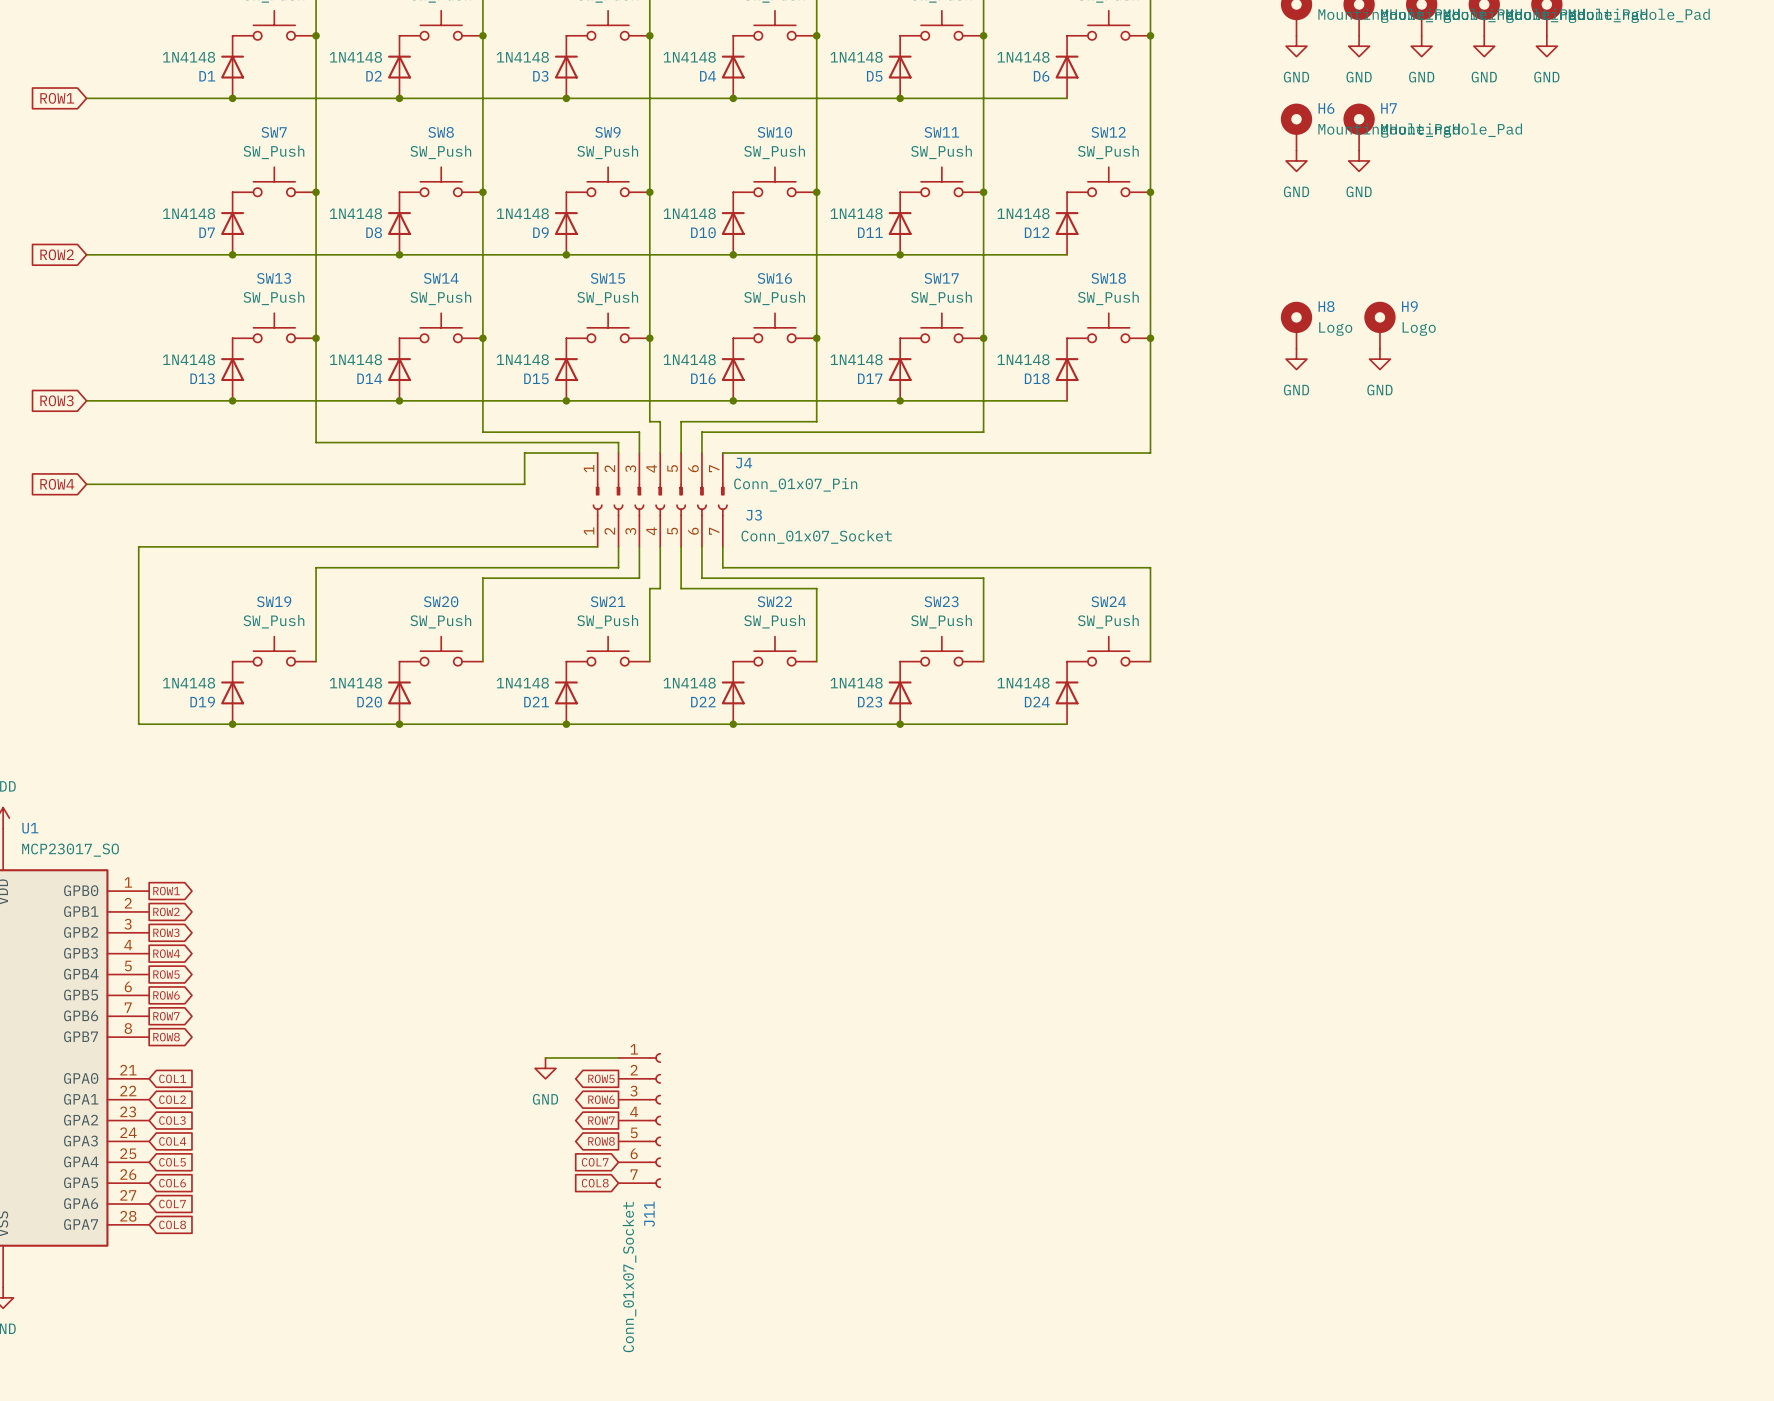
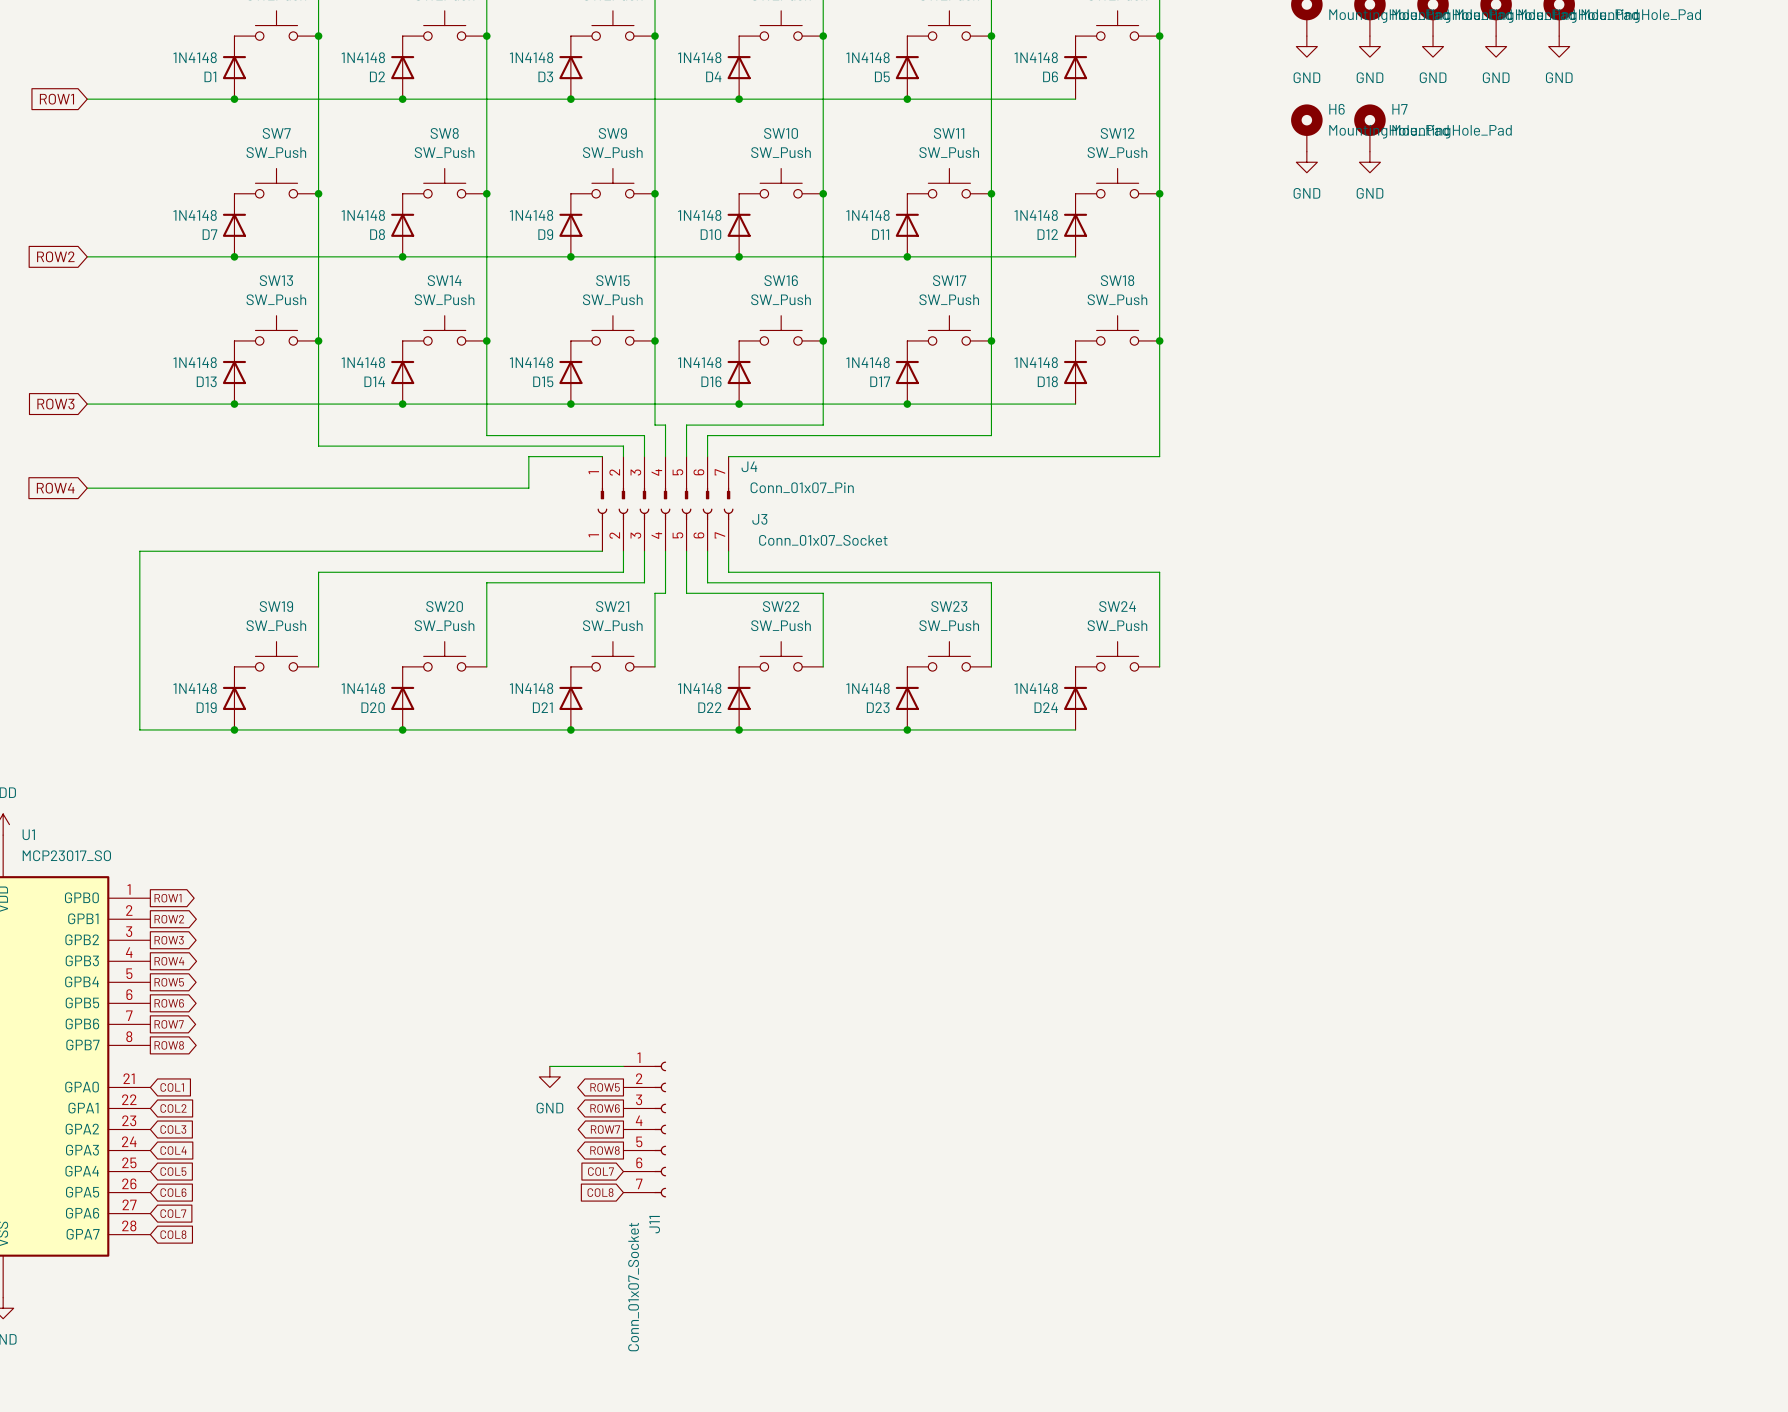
H8: Logo (1296, 325) -> none
H9: Logo (1379, 325) -> none
power symbol: GND (1296, 359) -> none
power symbol: GND (1379, 359) -> none

